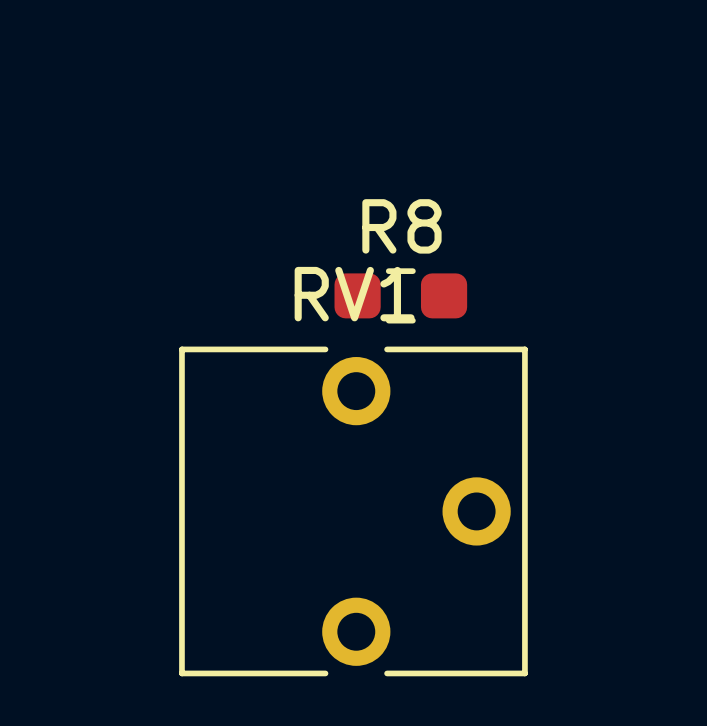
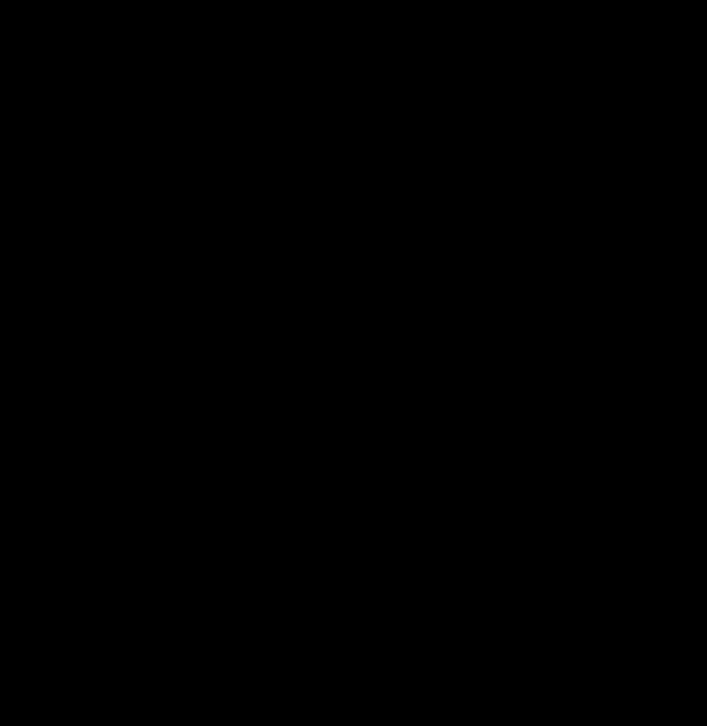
R8: (400, 295) -> none
RV1: (353, 511) -> none

